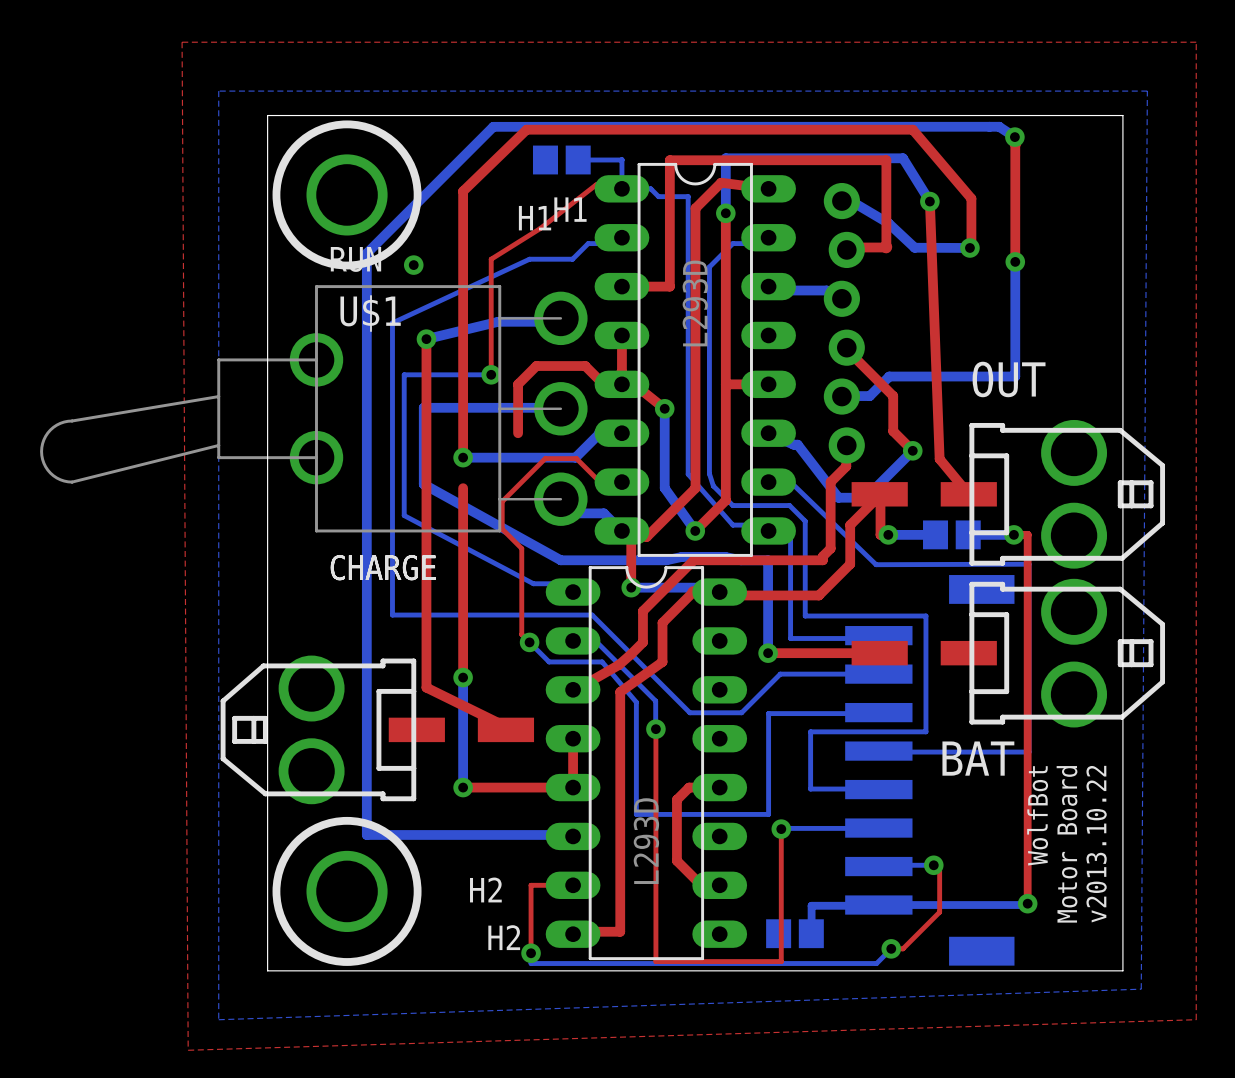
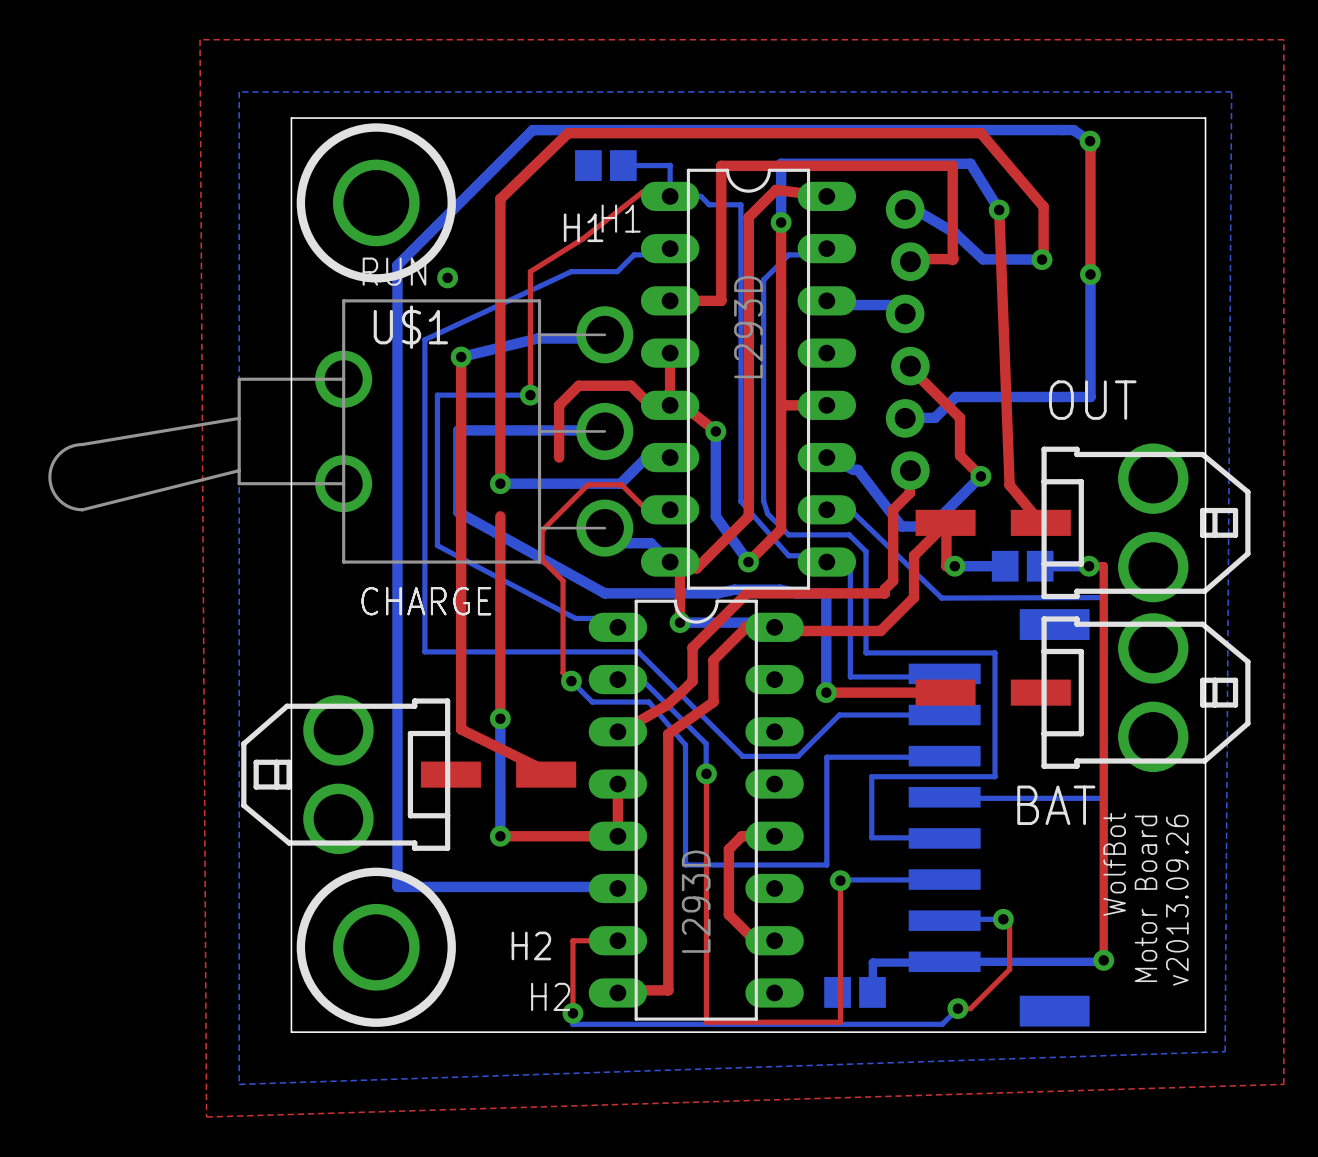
text: v2013.10.22 (1096, 844) -> v2013.09.26 (1177, 900)

